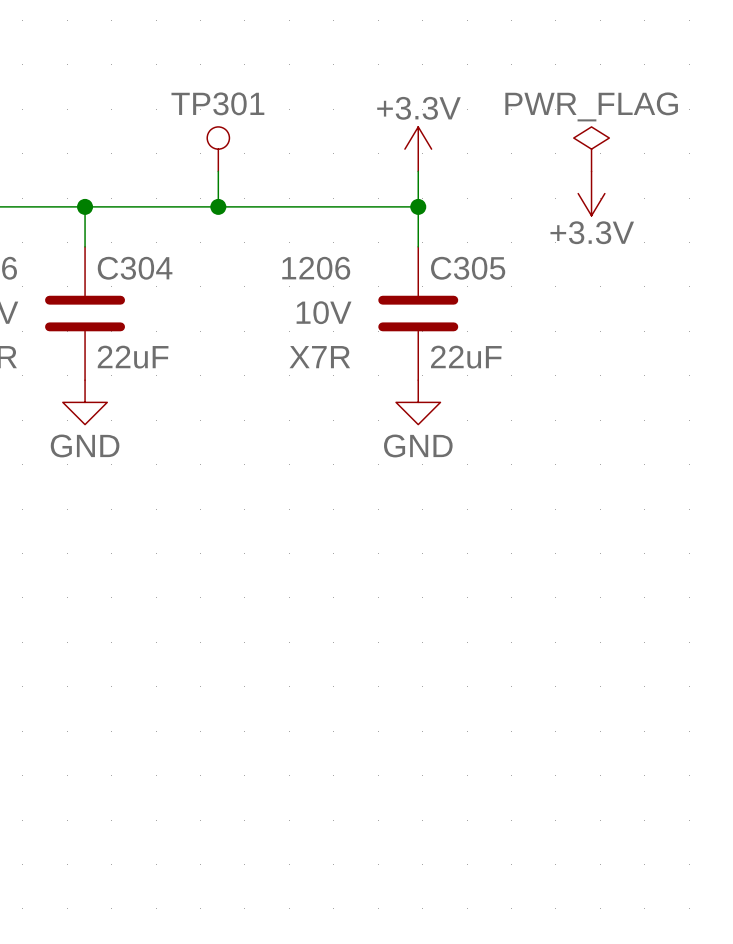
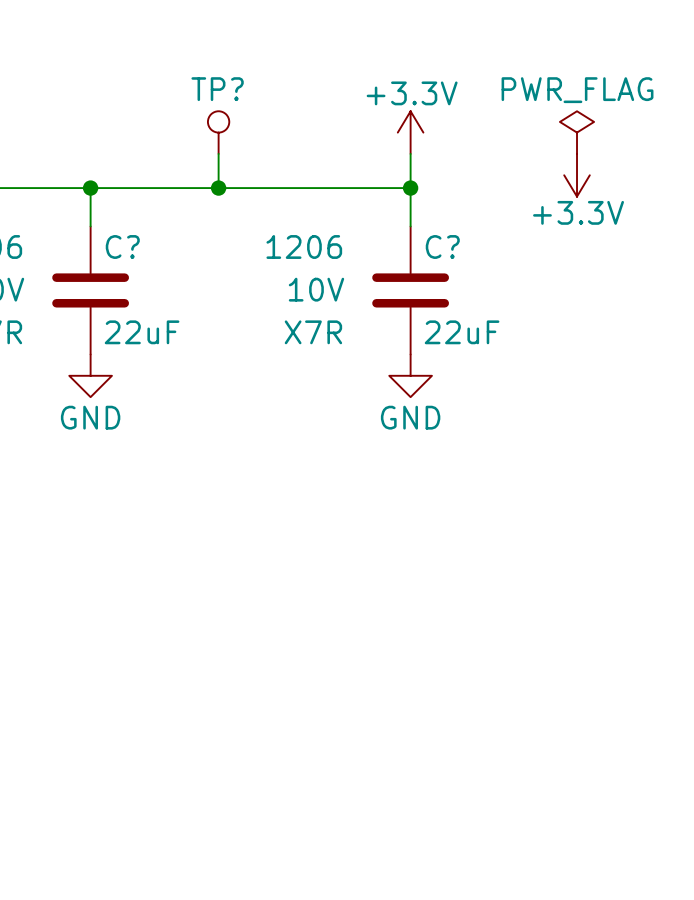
TP301 name: TP301 (217, 103) -> TP? (217, 89)
C304 name: C304 (135, 268) -> C? (122, 247)
C305 name: C305 (468, 268) -> C? (442, 247)

